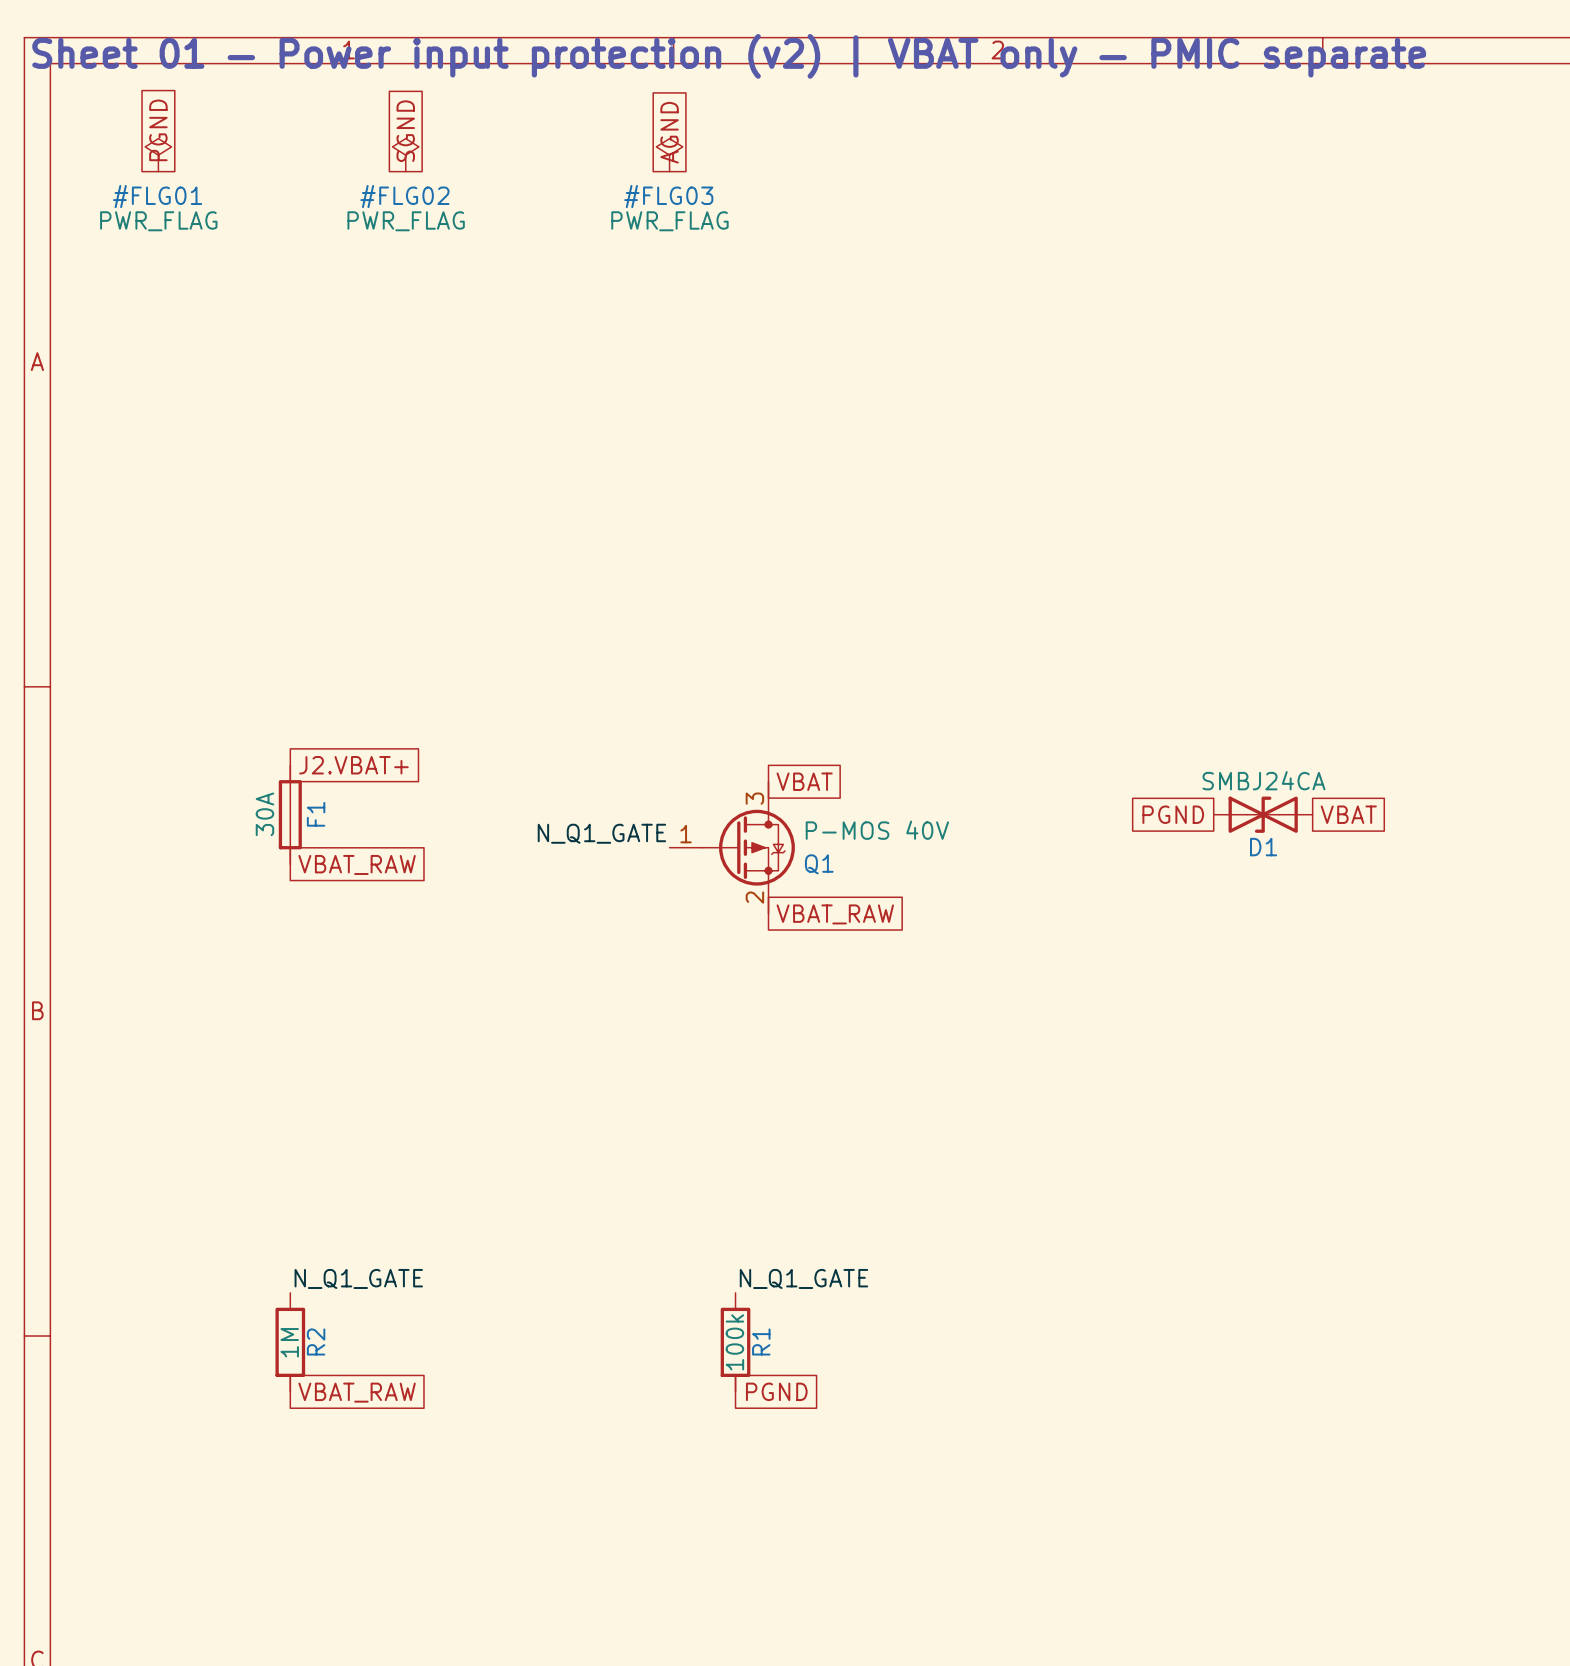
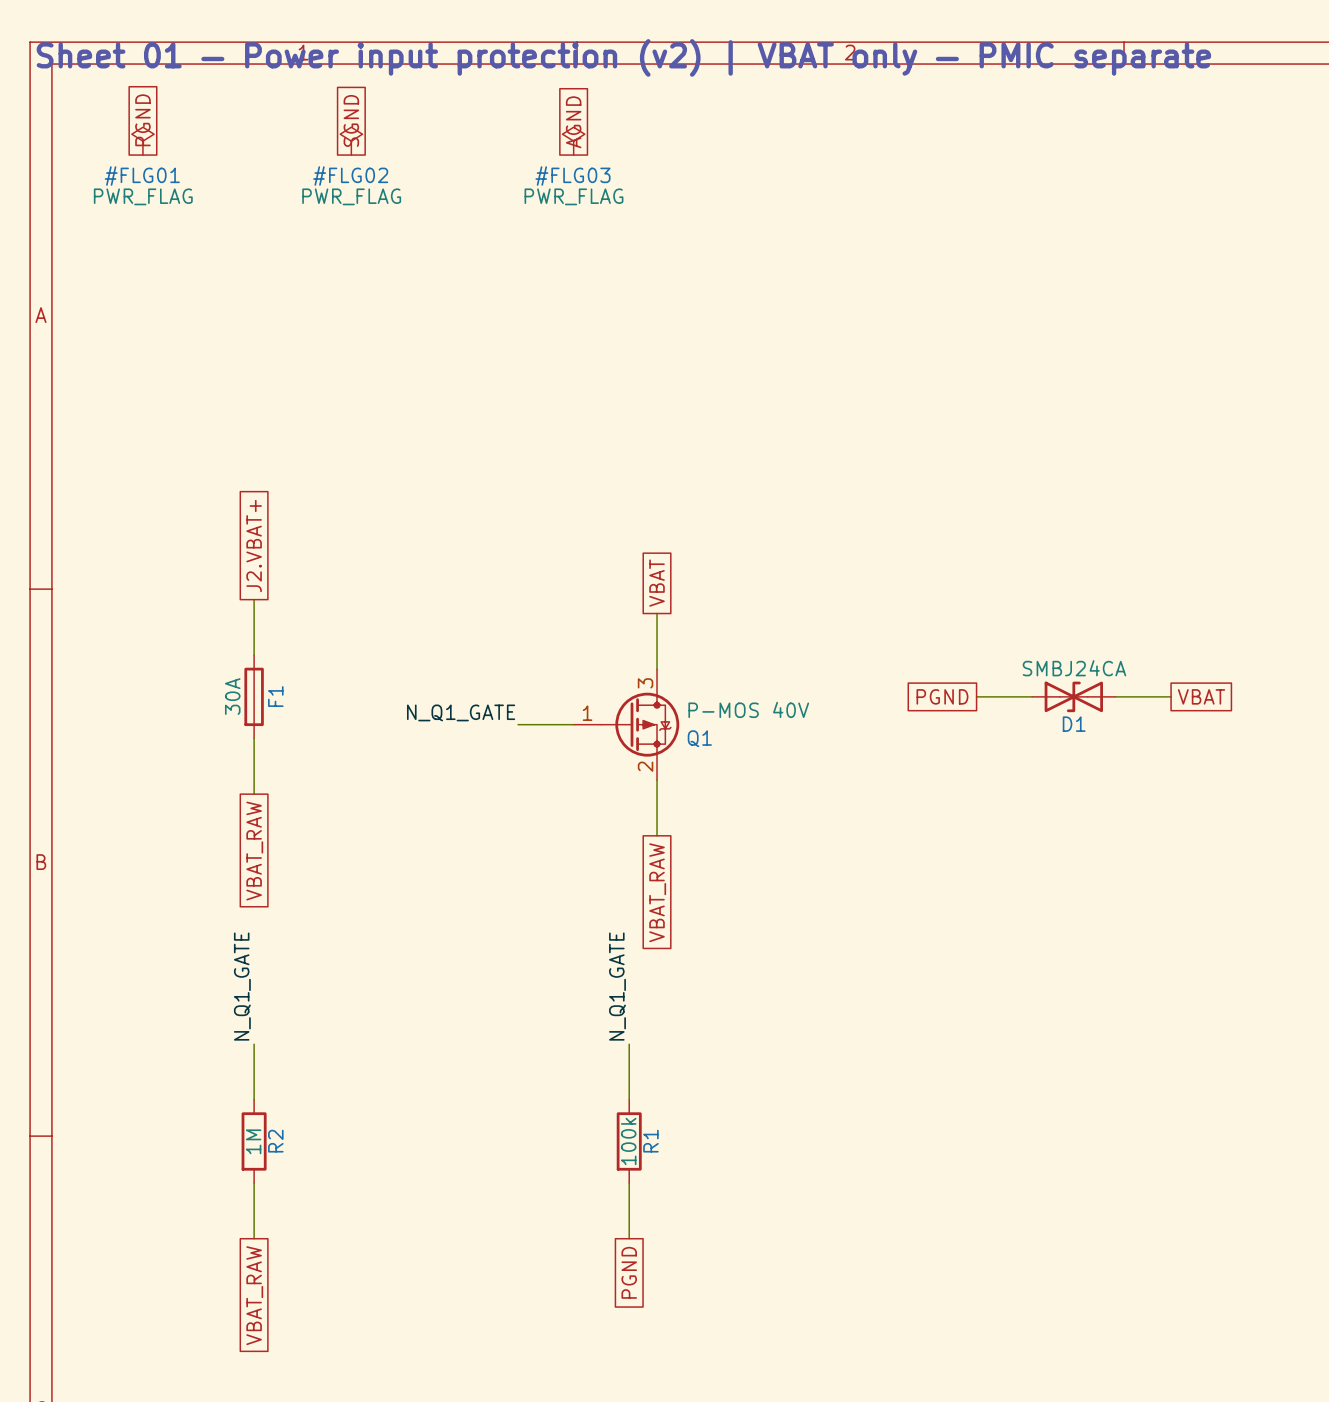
wire: none -> (254, 599) (254, 655)
wire: none -> (657, 613) (657, 669)
global label rotation: 0° (353, 765) -> 90° counterclockwise (254, 546)
global label position: J2.VBAT+ (353, 765) -> J2.VBAT+ (254, 546)
global label rotation: 0° (804, 781) -> 90° counterclockwise (657, 583)
global label position: VBAT (804, 781) -> VBAT (657, 583)
wire: none -> (976, 696) (1032, 696)
global label position: PGND (1173, 814) -> PGND (942, 696)
wire: none -> (1115, 696) (1171, 696)
global label position: VBAT (1348, 814) -> VBAT (1201, 696)
label position: N_Q1_GATE (601, 833) -> N_Q1_GATE (461, 712)
wire: none -> (518, 724) (573, 724)
wire: none -> (254, 738) (254, 794)
global label rotation: 0° (357, 864) -> 90° clockwise (254, 851)
global label position: VBAT_RAW (357, 864) -> VBAT_RAW (254, 851)
wire: none -> (657, 780) (657, 835)
global label rotation: 0° (835, 914) -> 90° clockwise (657, 892)
global label position: VBAT_RAW (835, 914) -> VBAT_RAW (657, 892)
wire: none -> (254, 1044) (254, 1099)
wire: none -> (629, 1044) (629, 1099)
label rotation: 0° (358, 1278) -> 90° counterclockwise (242, 986)
label position: N_Q1_GATE (358, 1278) -> N_Q1_GATE (242, 986)
label rotation: 0° (803, 1278) -> 90° counterclockwise (617, 986)
label position: N_Q1_GATE (803, 1278) -> N_Q1_GATE (617, 986)
wire: none -> (254, 1183) (254, 1238)
wire: none -> (629, 1183) (629, 1238)
global label rotation: 0° (776, 1391) -> 90° clockwise (629, 1272)
global label position: PGND (776, 1391) -> PGND (629, 1272)
global label rotation: 0° (357, 1392) -> 90° clockwise (254, 1295)
global label position: VBAT_RAW (357, 1392) -> VBAT_RAW (254, 1295)

